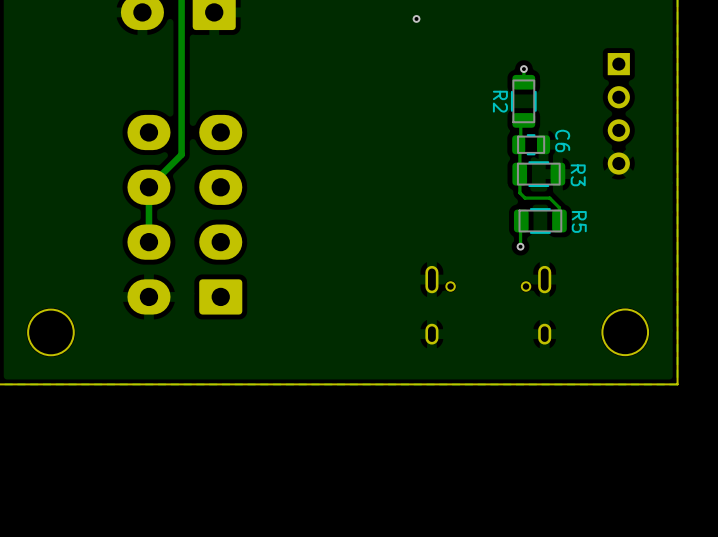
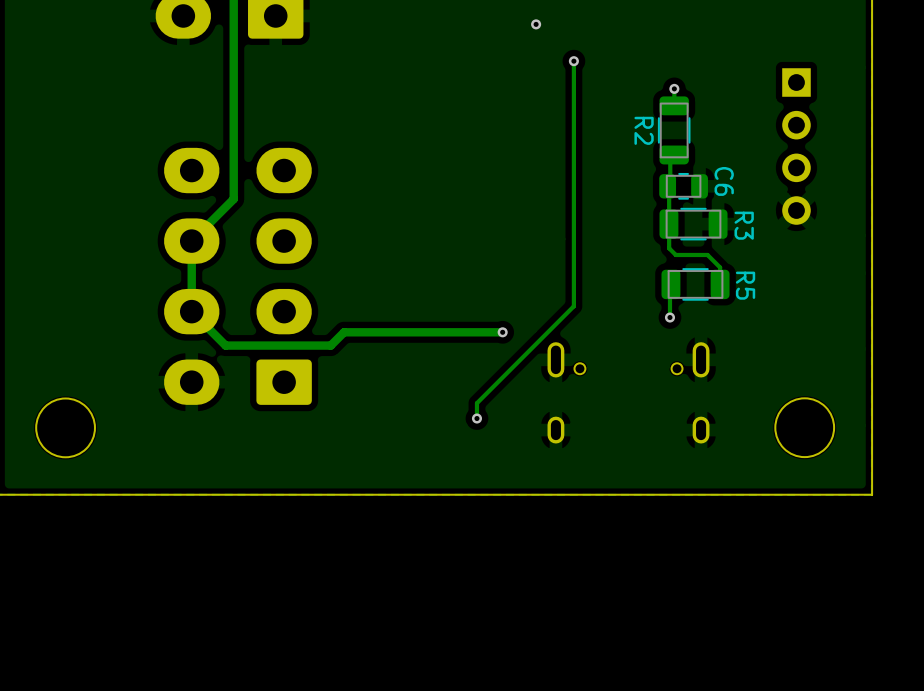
track: none -> (573, 61) (573, 306) (476, 403) (476, 418)
via: none -> (573, 61)
track: none -> (191, 311) (225, 345) (330, 345) (344, 332) (502, 332)
via: none -> (502, 332)
via: none -> (476, 418)

